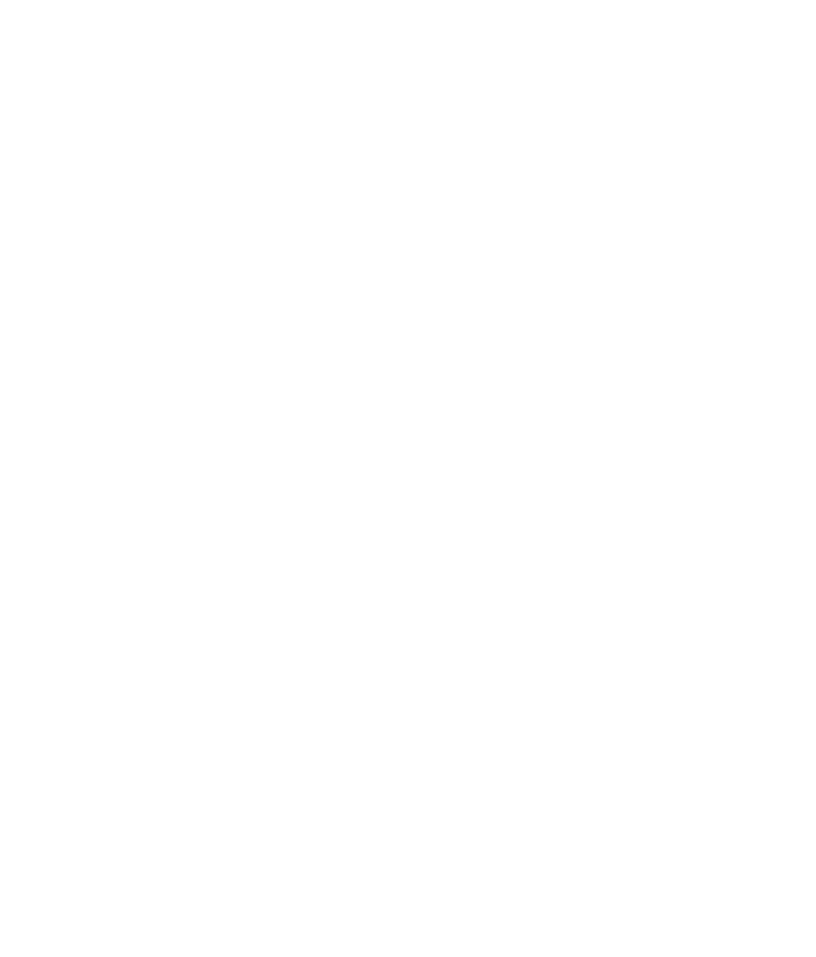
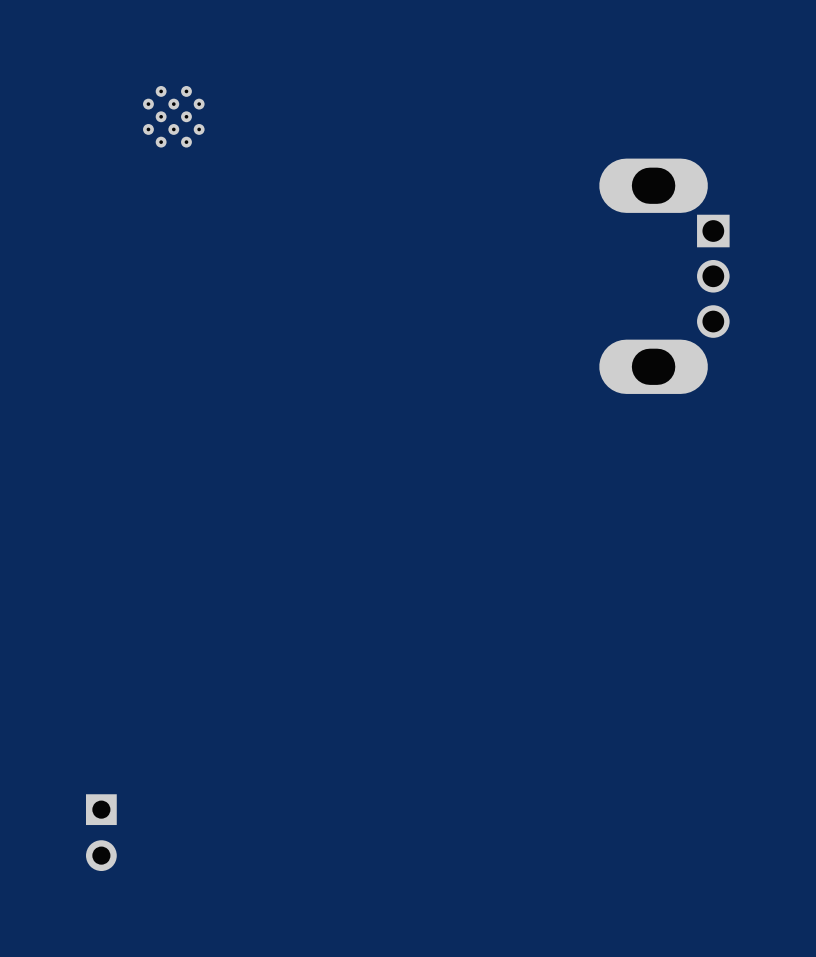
part: none -> (173, 116)
part: none -> (664, 276)
part: none -> (101, 832)

